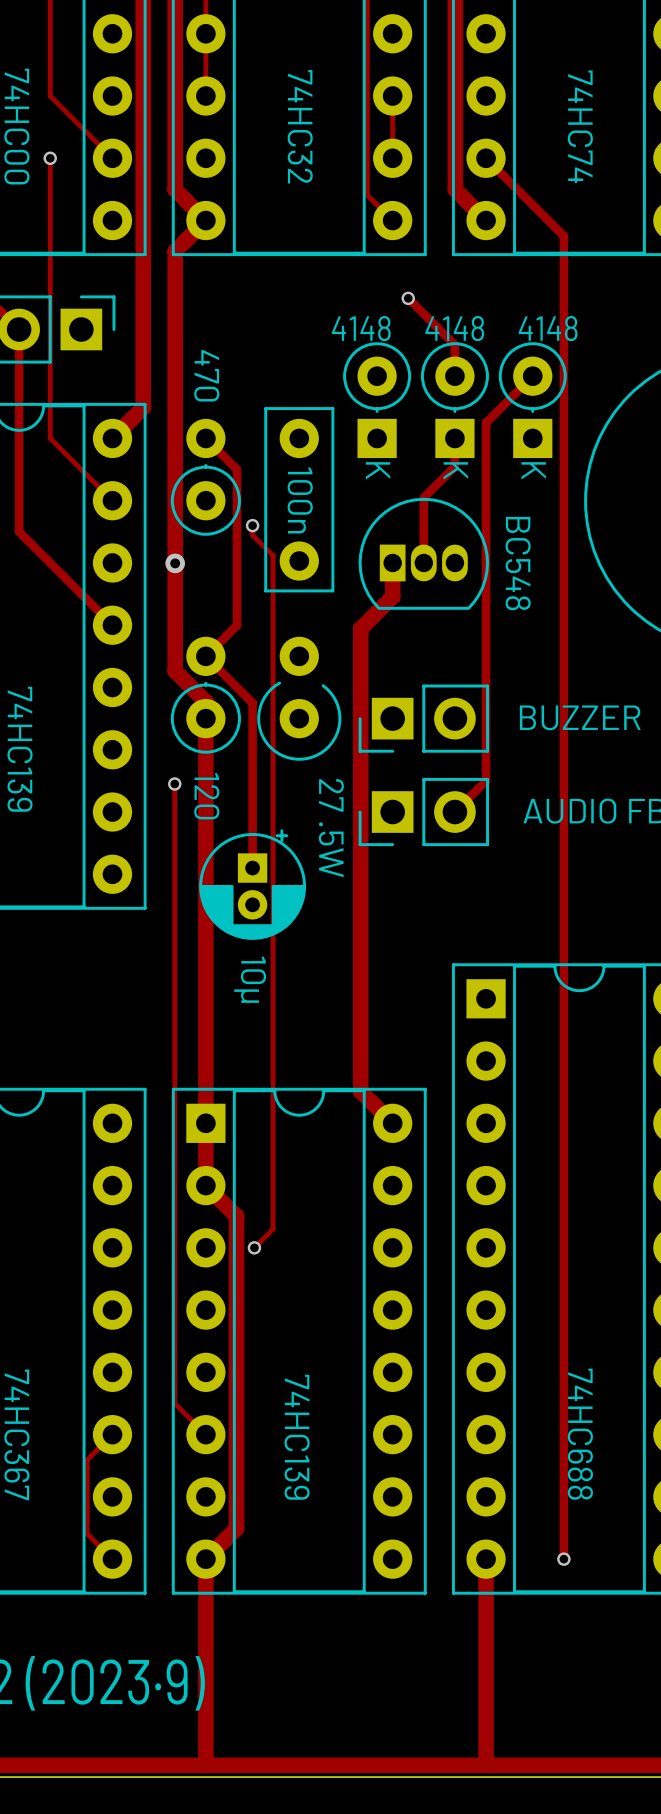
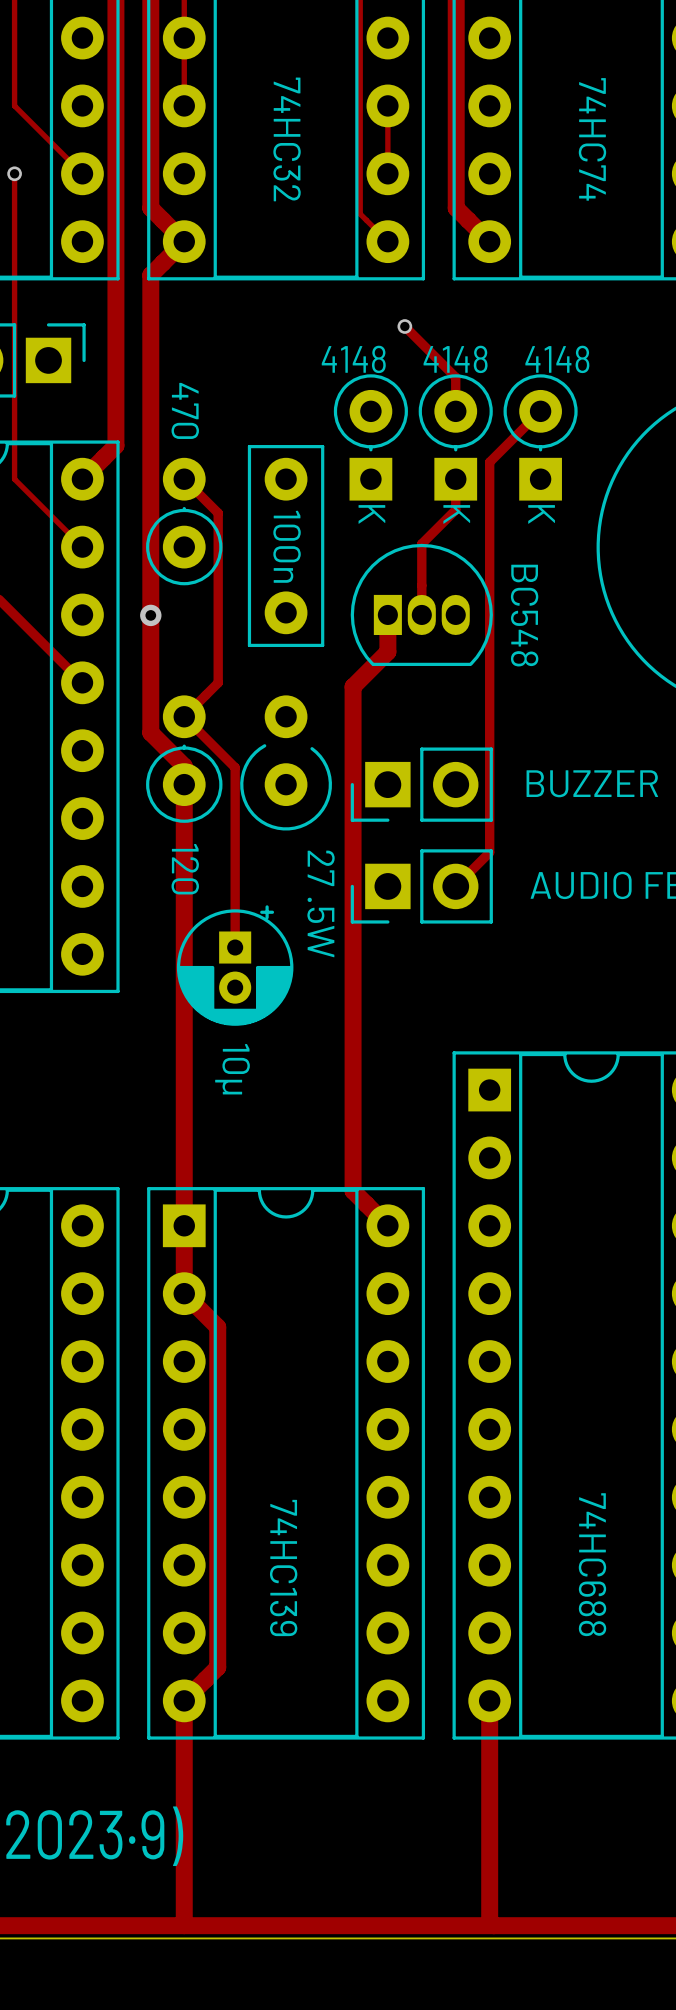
track: (486, 158) (563, 236) (563, 1559) -> none
track: (252, 525) (252, 535) (273, 555) (273, 1229) (254, 1247) -> none
via: (252, 525) -> none
track: (174, 784) (174, 1403) (205, 1434) -> none
via: (174, 784) -> none
via: (254, 1247) -> none
track: (112, 1434) (87, 1459) (87, 1533) (112, 1559) -> none
via: (563, 1559) -> none

